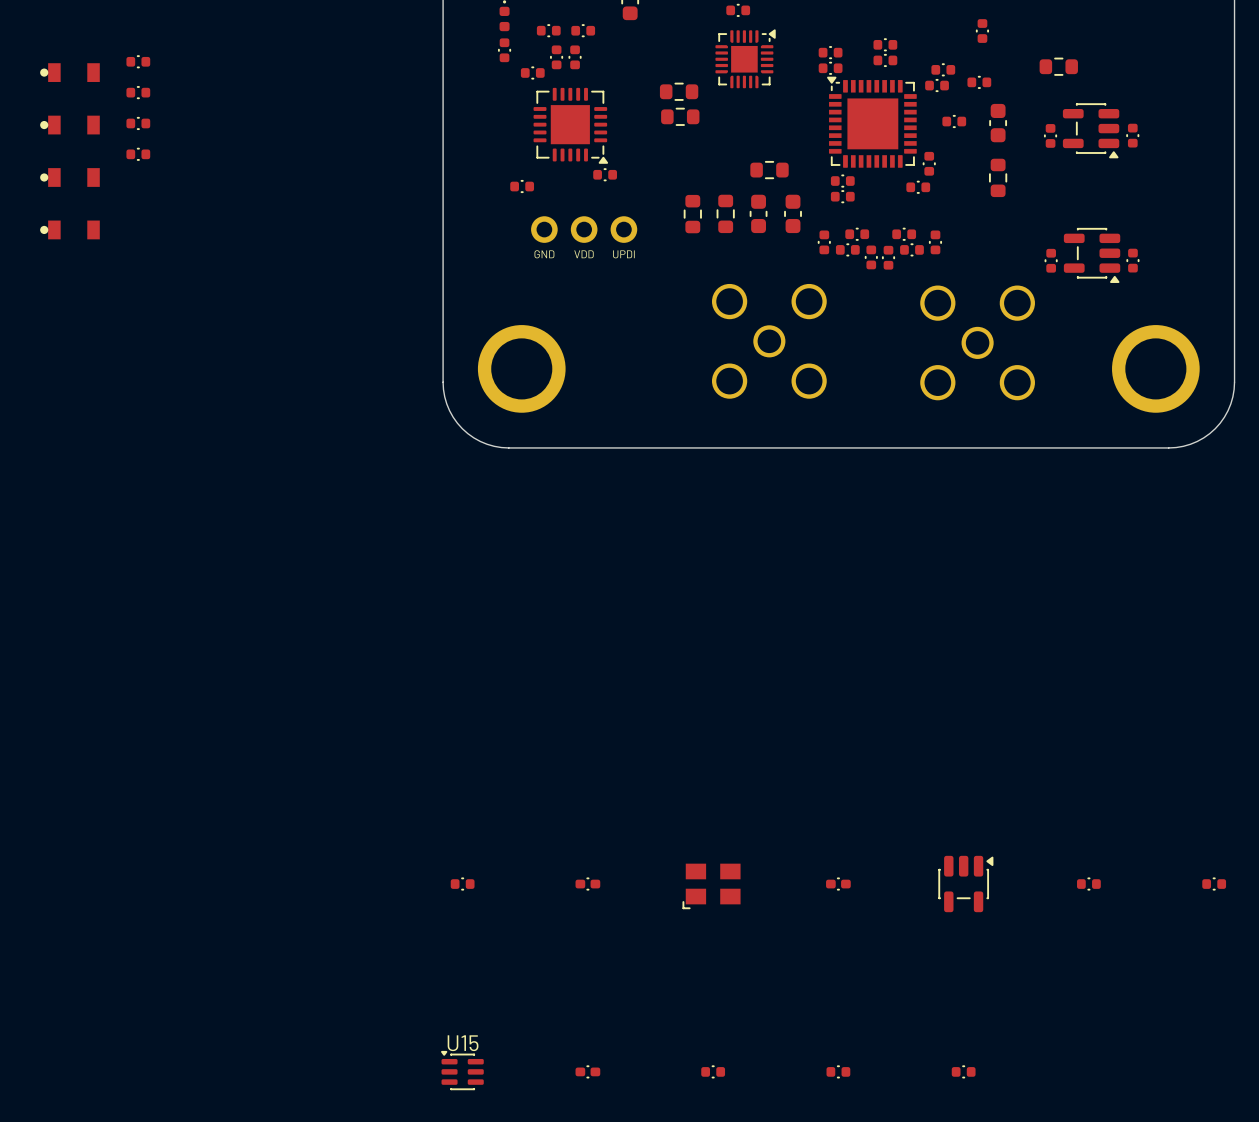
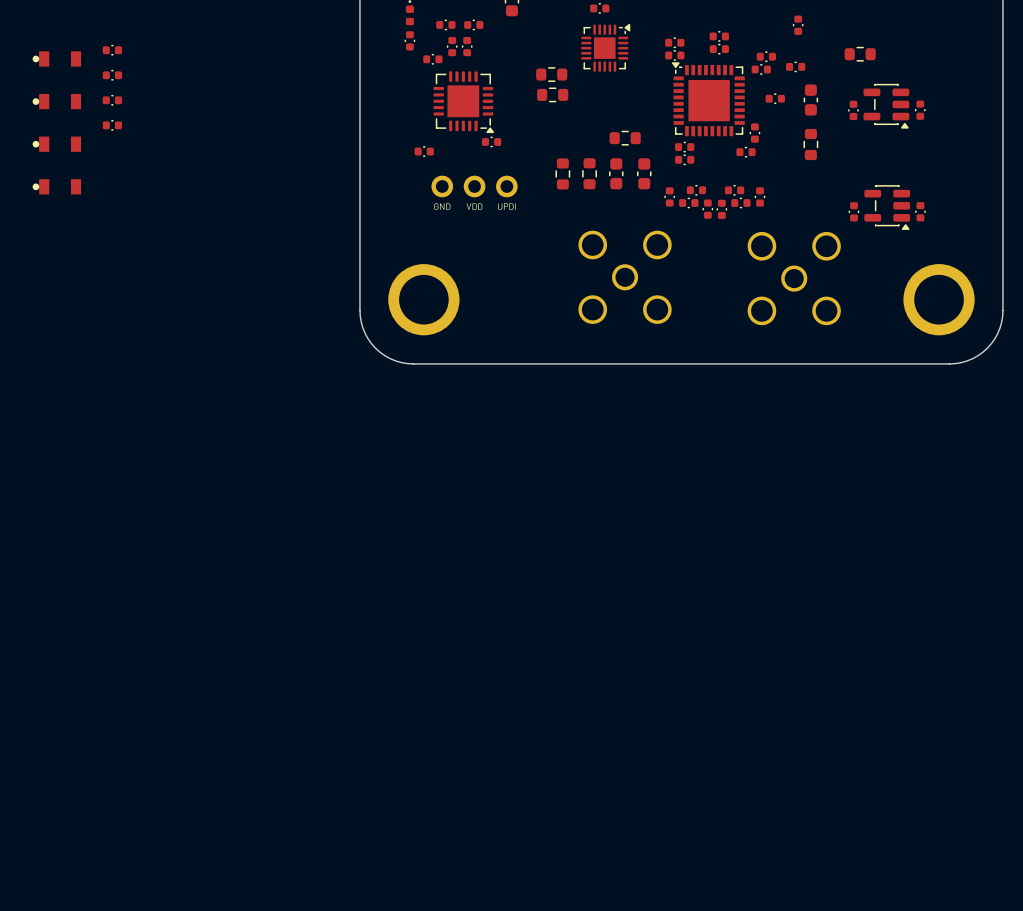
part: (462, 884) -> none
part: (587, 884) -> none
part: (838, 884) -> none
part: (965, 884) -> none
part: (1088, 884) -> none
part: (1214, 884) -> none
part: (711, 886) -> none
U15: (462, 1070) -> none
part: (587, 1071) -> none
part: (713, 1071) -> none
part: (838, 1071) -> none
part: (963, 1071) -> none

